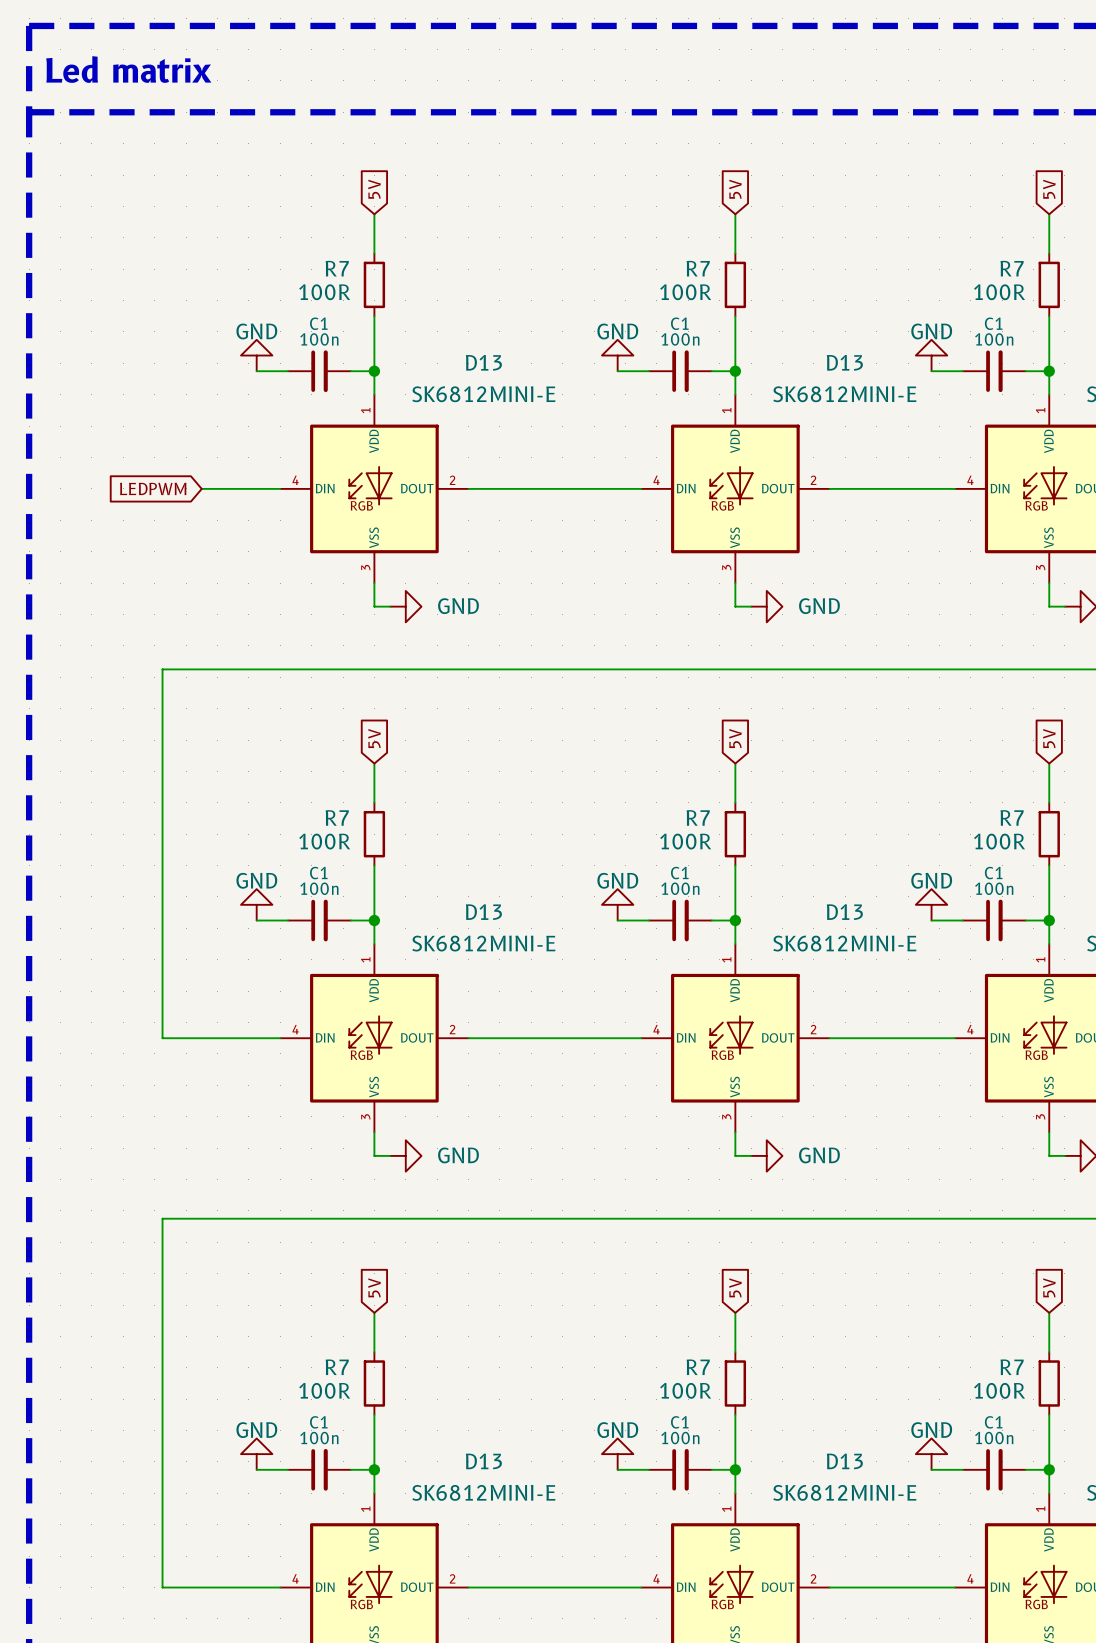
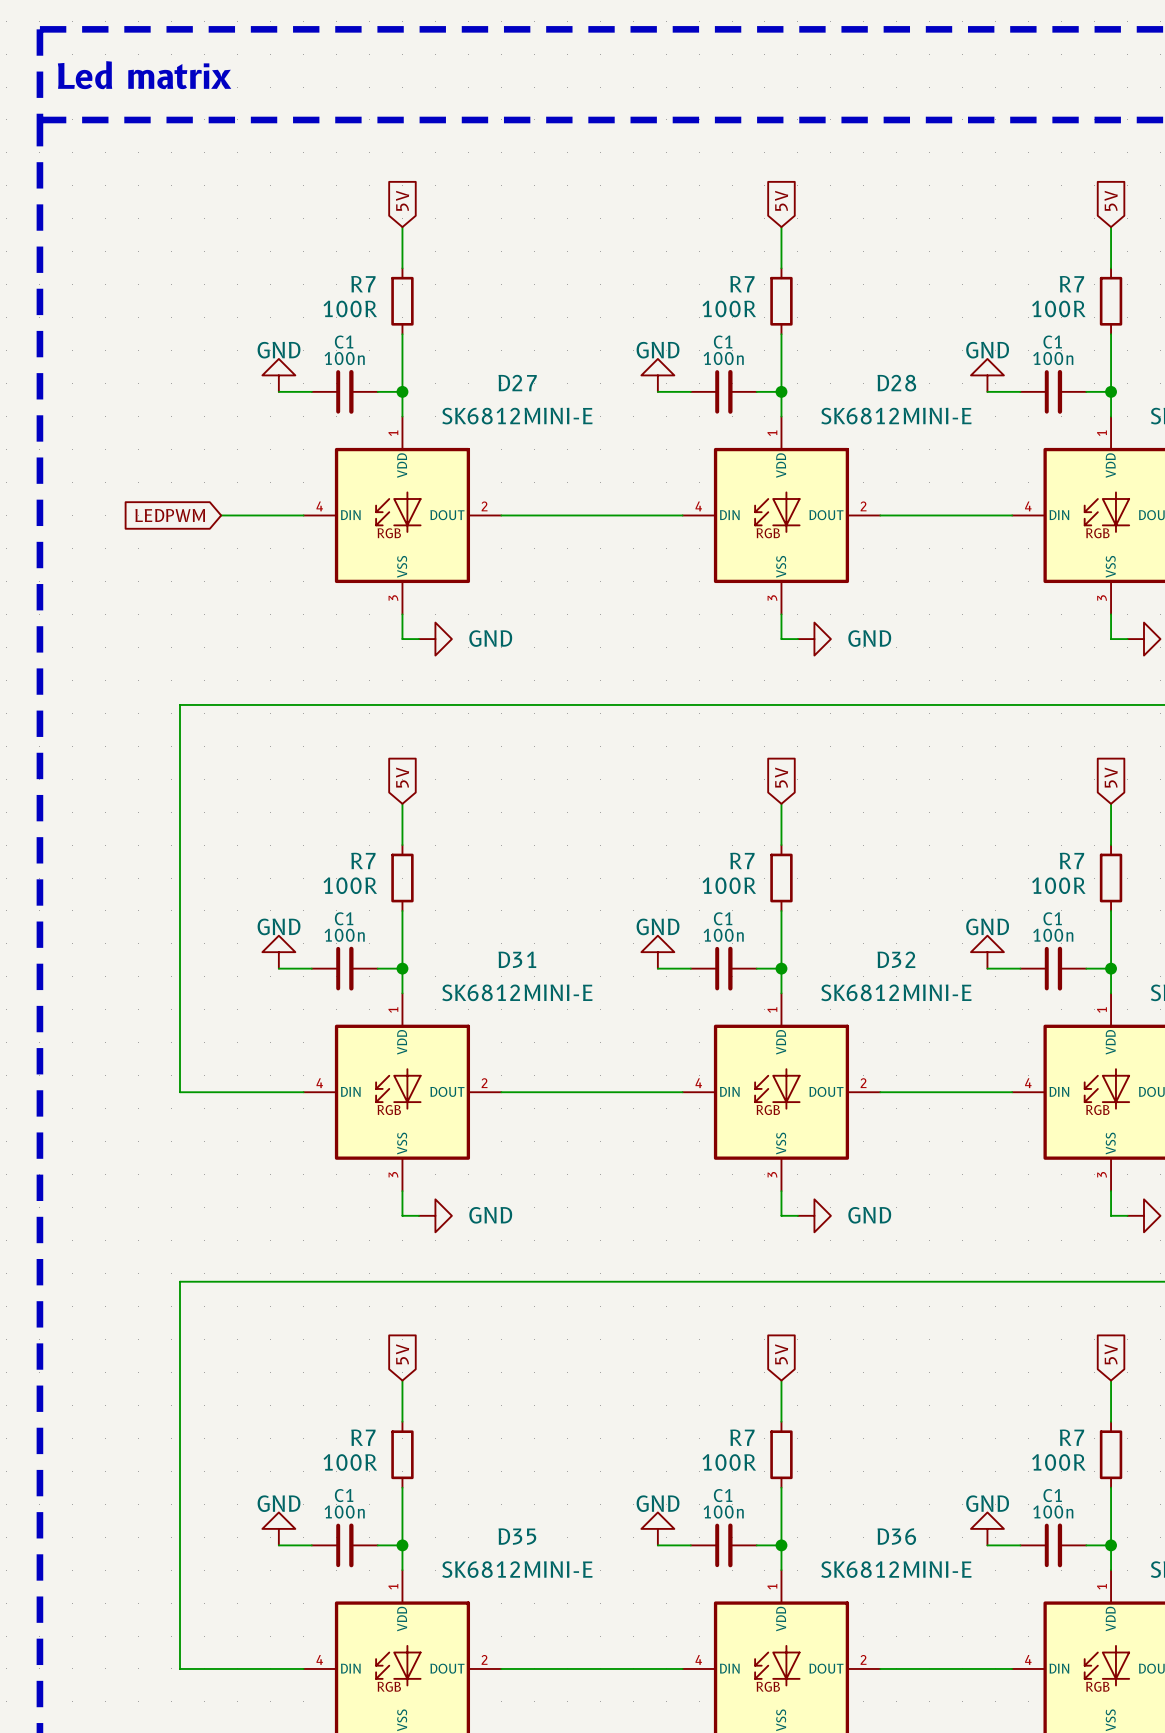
D13 name: D13 (483, 362) -> D27 (517, 383)
D13 name: D13 (844, 362) -> D28 (896, 383)
D13 name: D13 (483, 912) -> D31 (517, 959)
D13 name: D13 (844, 912) -> D32 (896, 959)
D13 name: D13 (483, 1461) -> D35 (517, 1536)
D13 name: D13 (844, 1461) -> D36 (896, 1536)

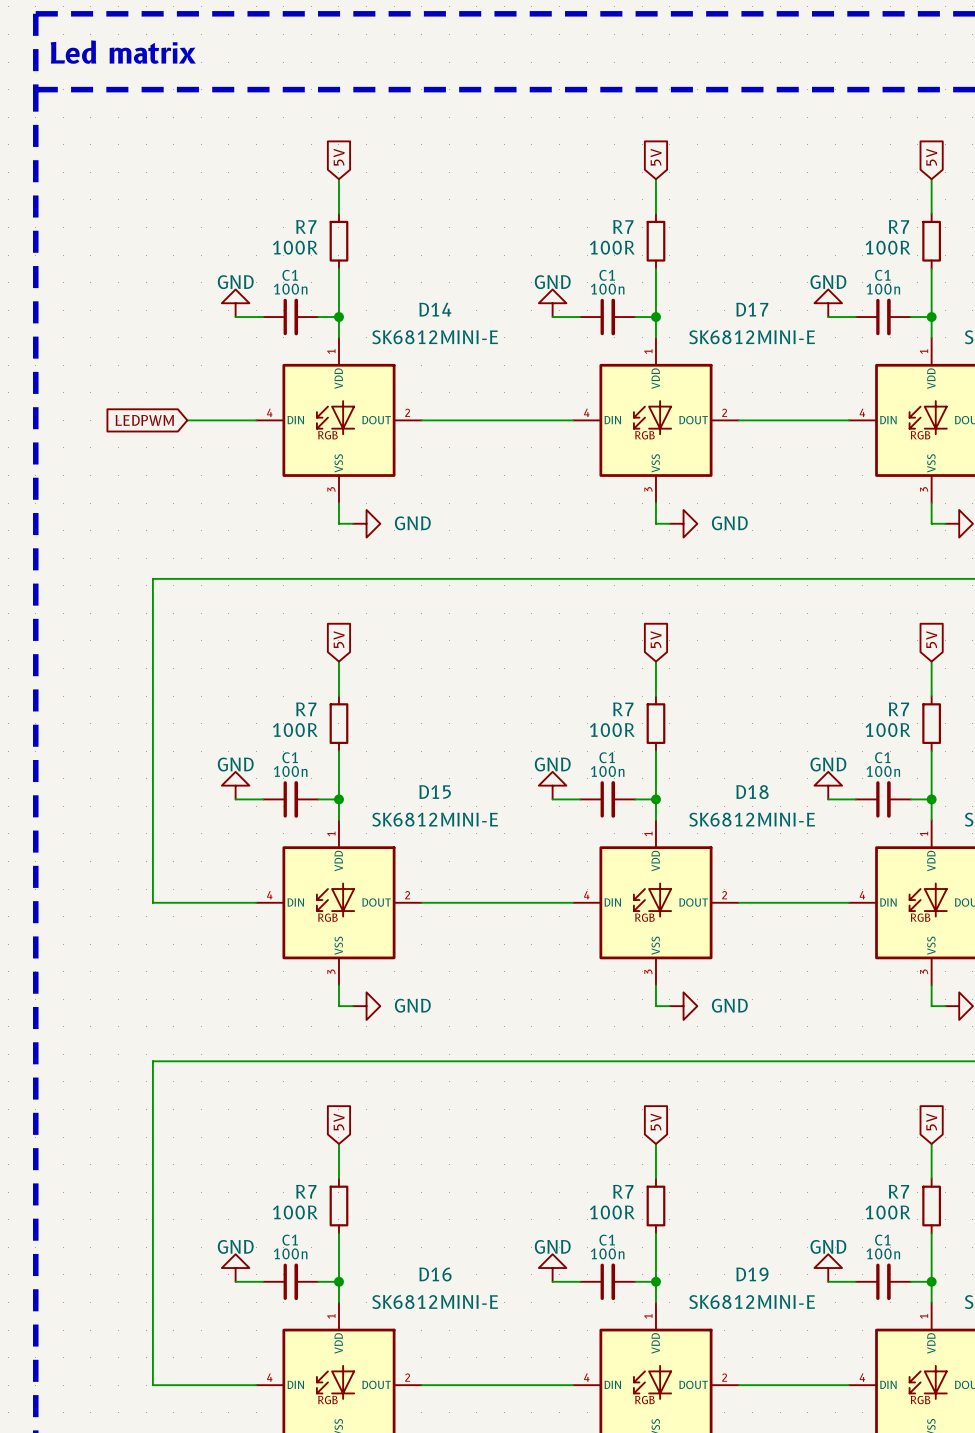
D27 name: D27 (517, 383) -> D14 (435, 309)
D28 name: D28 (896, 383) -> D17 (752, 309)
D31 name: D31 (517, 959) -> D15 (435, 792)
D32 name: D32 (896, 959) -> D18 (752, 792)
D35 name: D35 (517, 1536) -> D16 (435, 1274)
D36 name: D36 (896, 1536) -> D19 (752, 1274)

